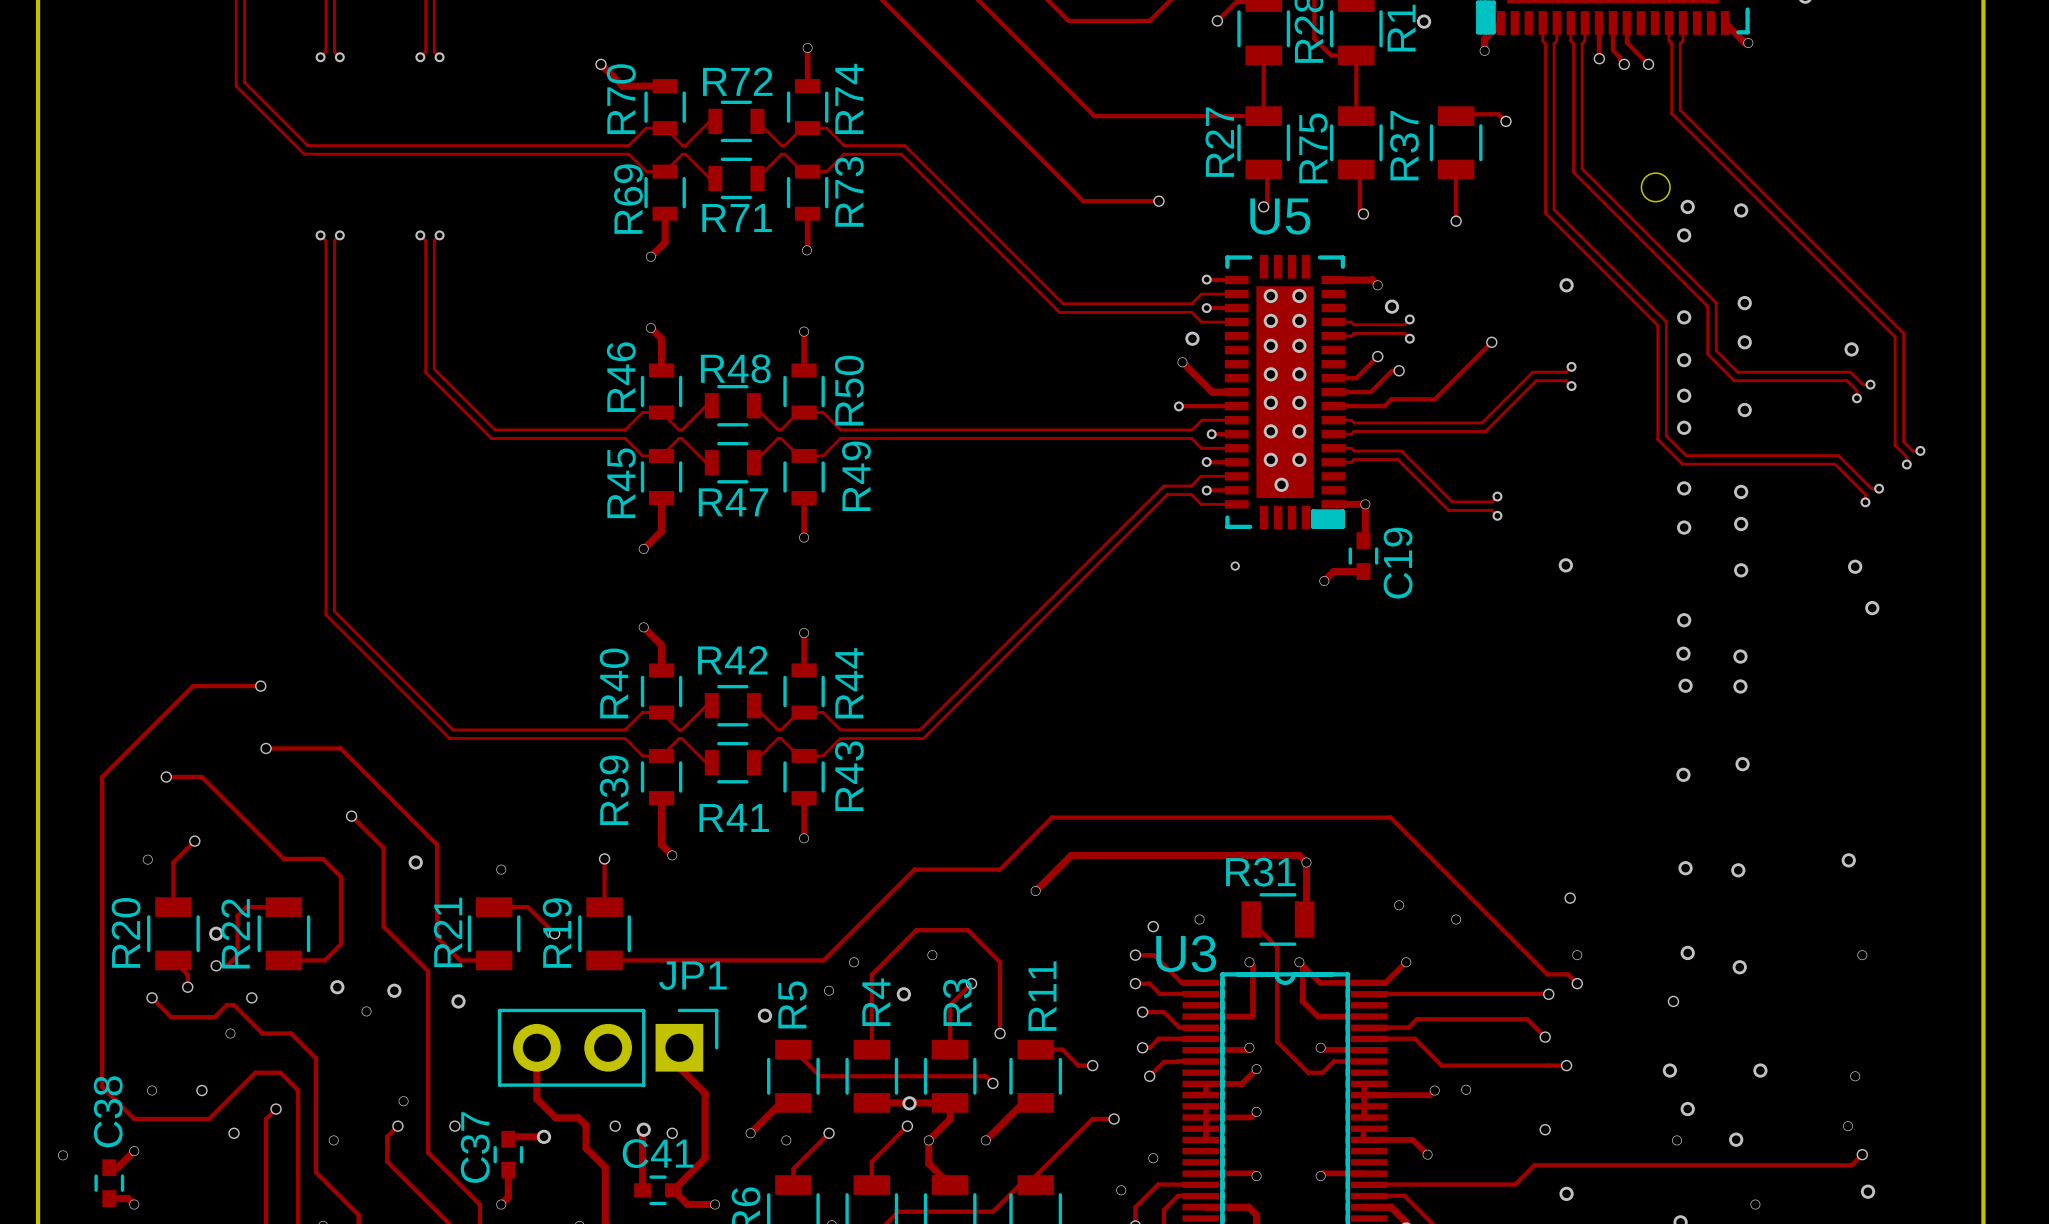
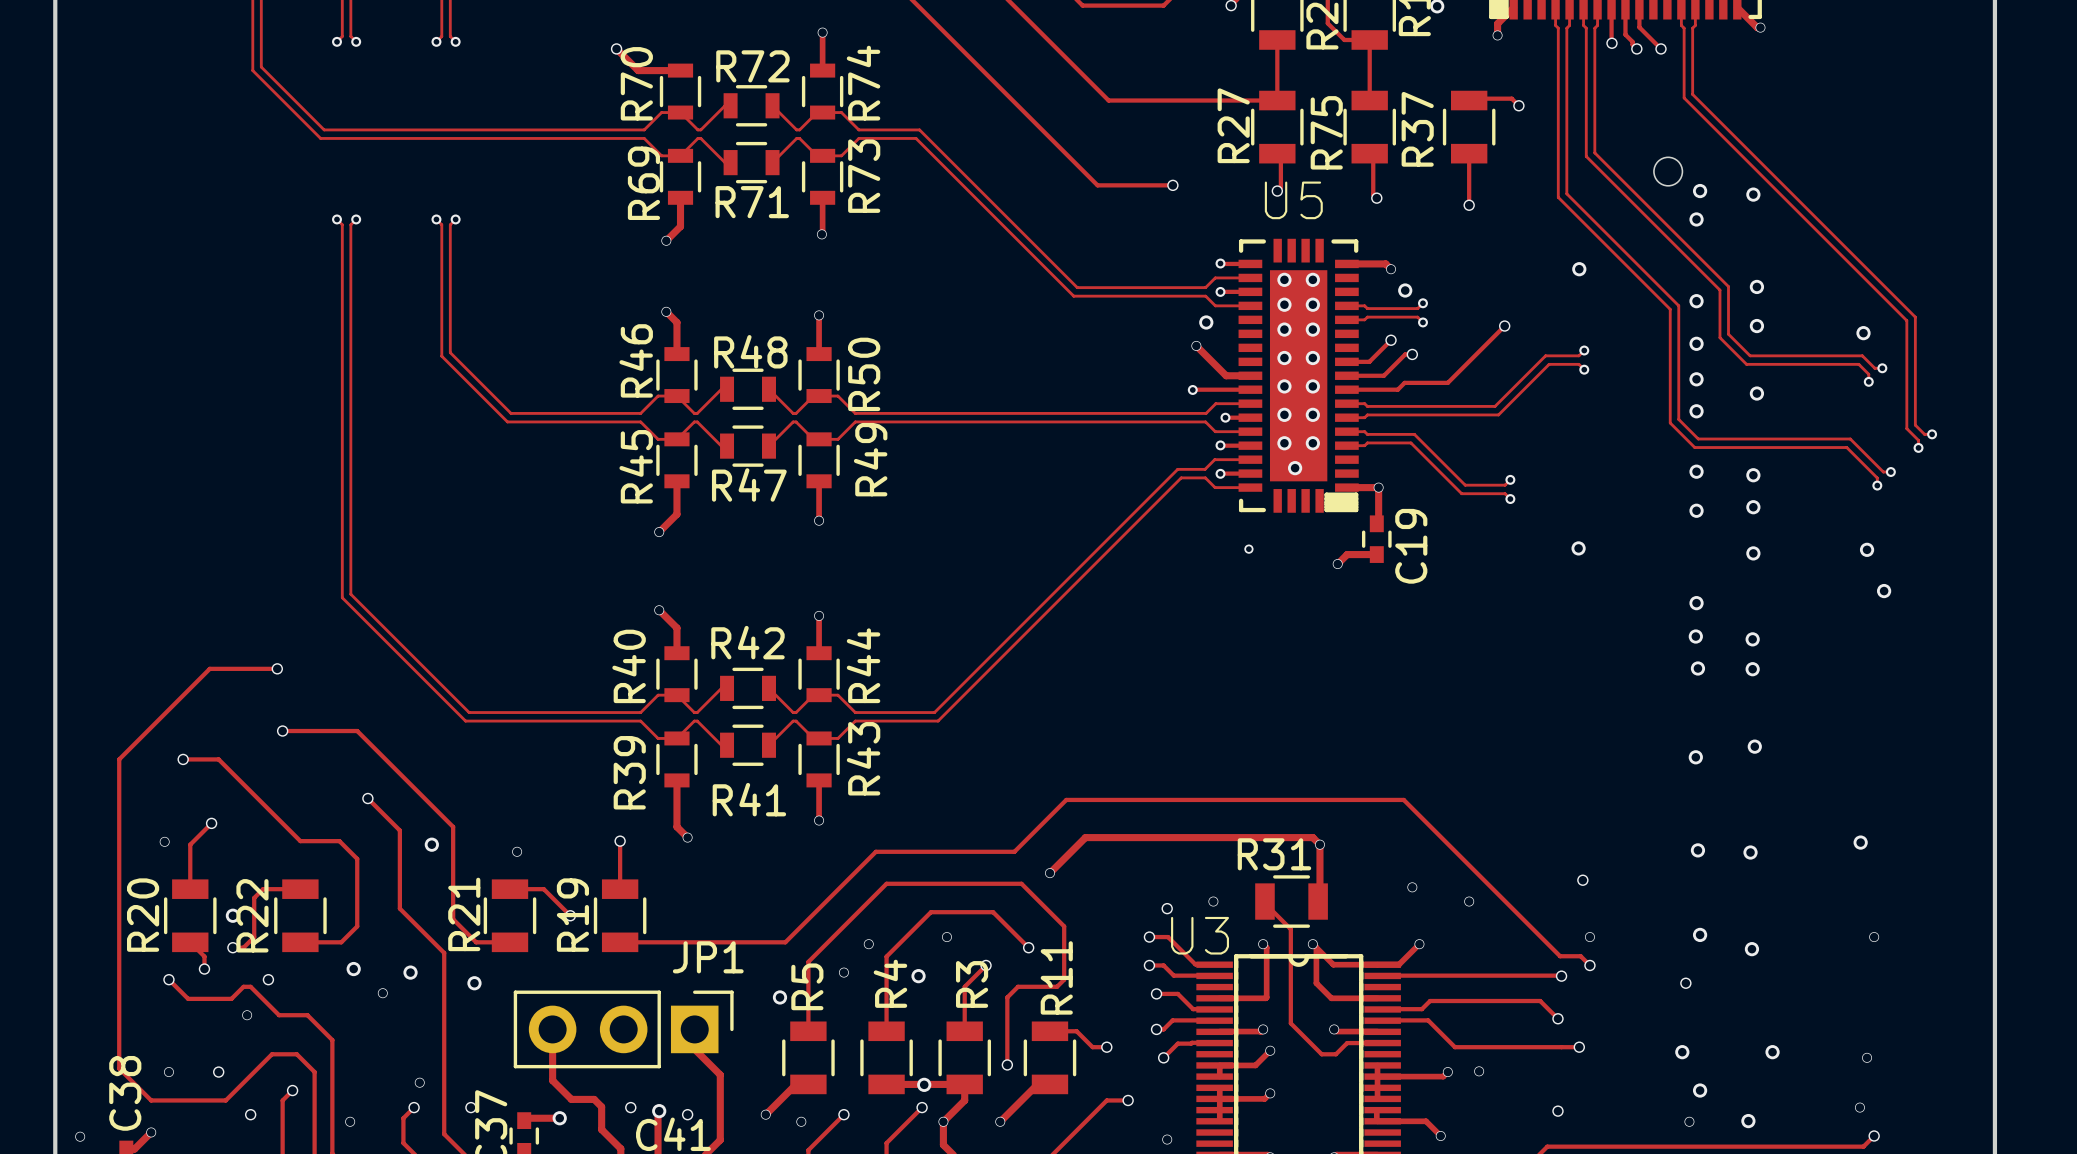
track: (914, 869) (823, 960) (770, 960) -> (929, 851) (875, 851) (785, 942)
track: (967, 930) (1000, 962) (1000, 1033) -> (982, 912) (993, 912) (1028, 947)
via position: (1000, 1033) -> (1028, 947)
track: (793, 1049) (820, 1076) (985, 1076) (992, 1083) -> (808, 1031) (808, 961) (886, 883) (1021, 883) (1064, 926) (1064, 979) (1057, 986) (1018, 986) (1007, 997) (1007, 1064)

